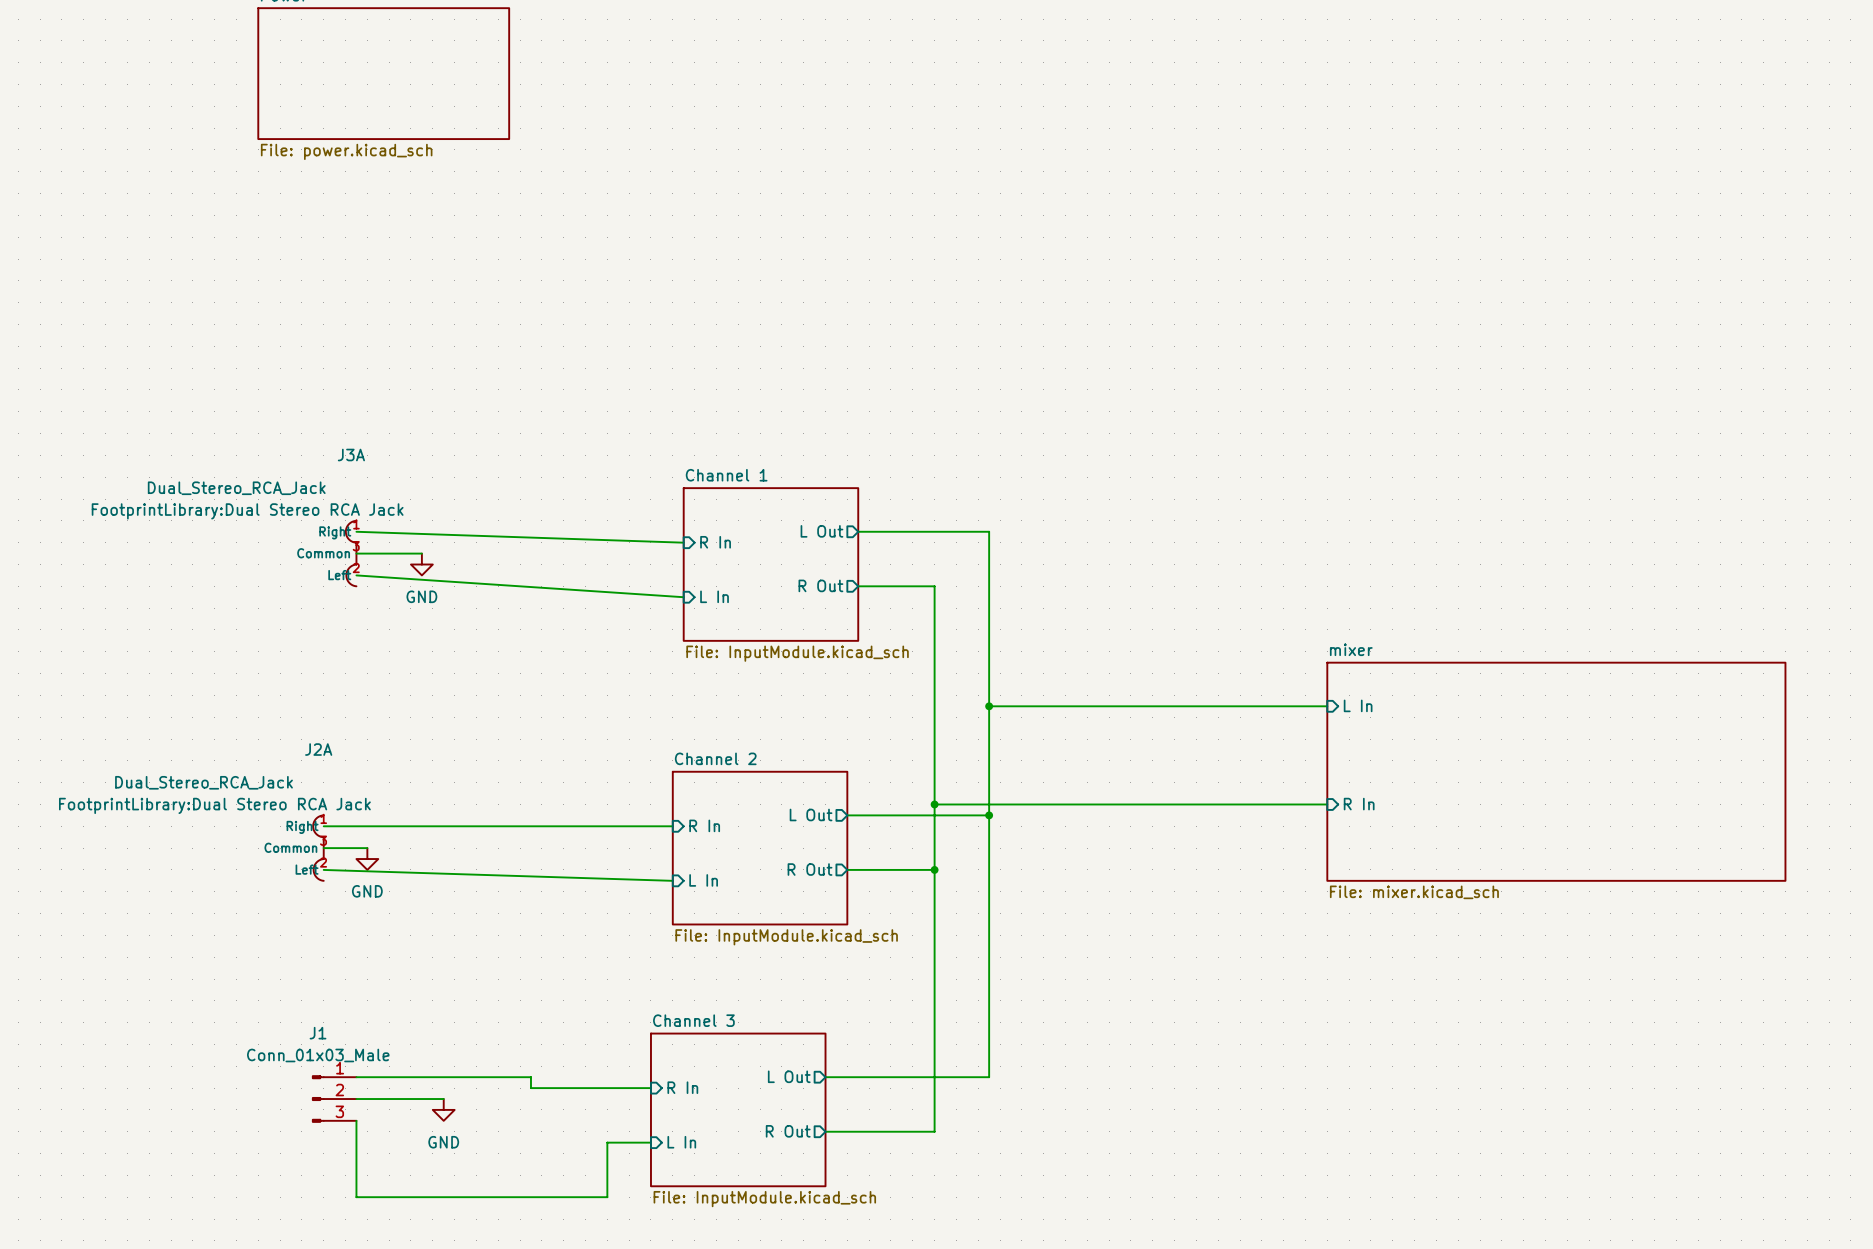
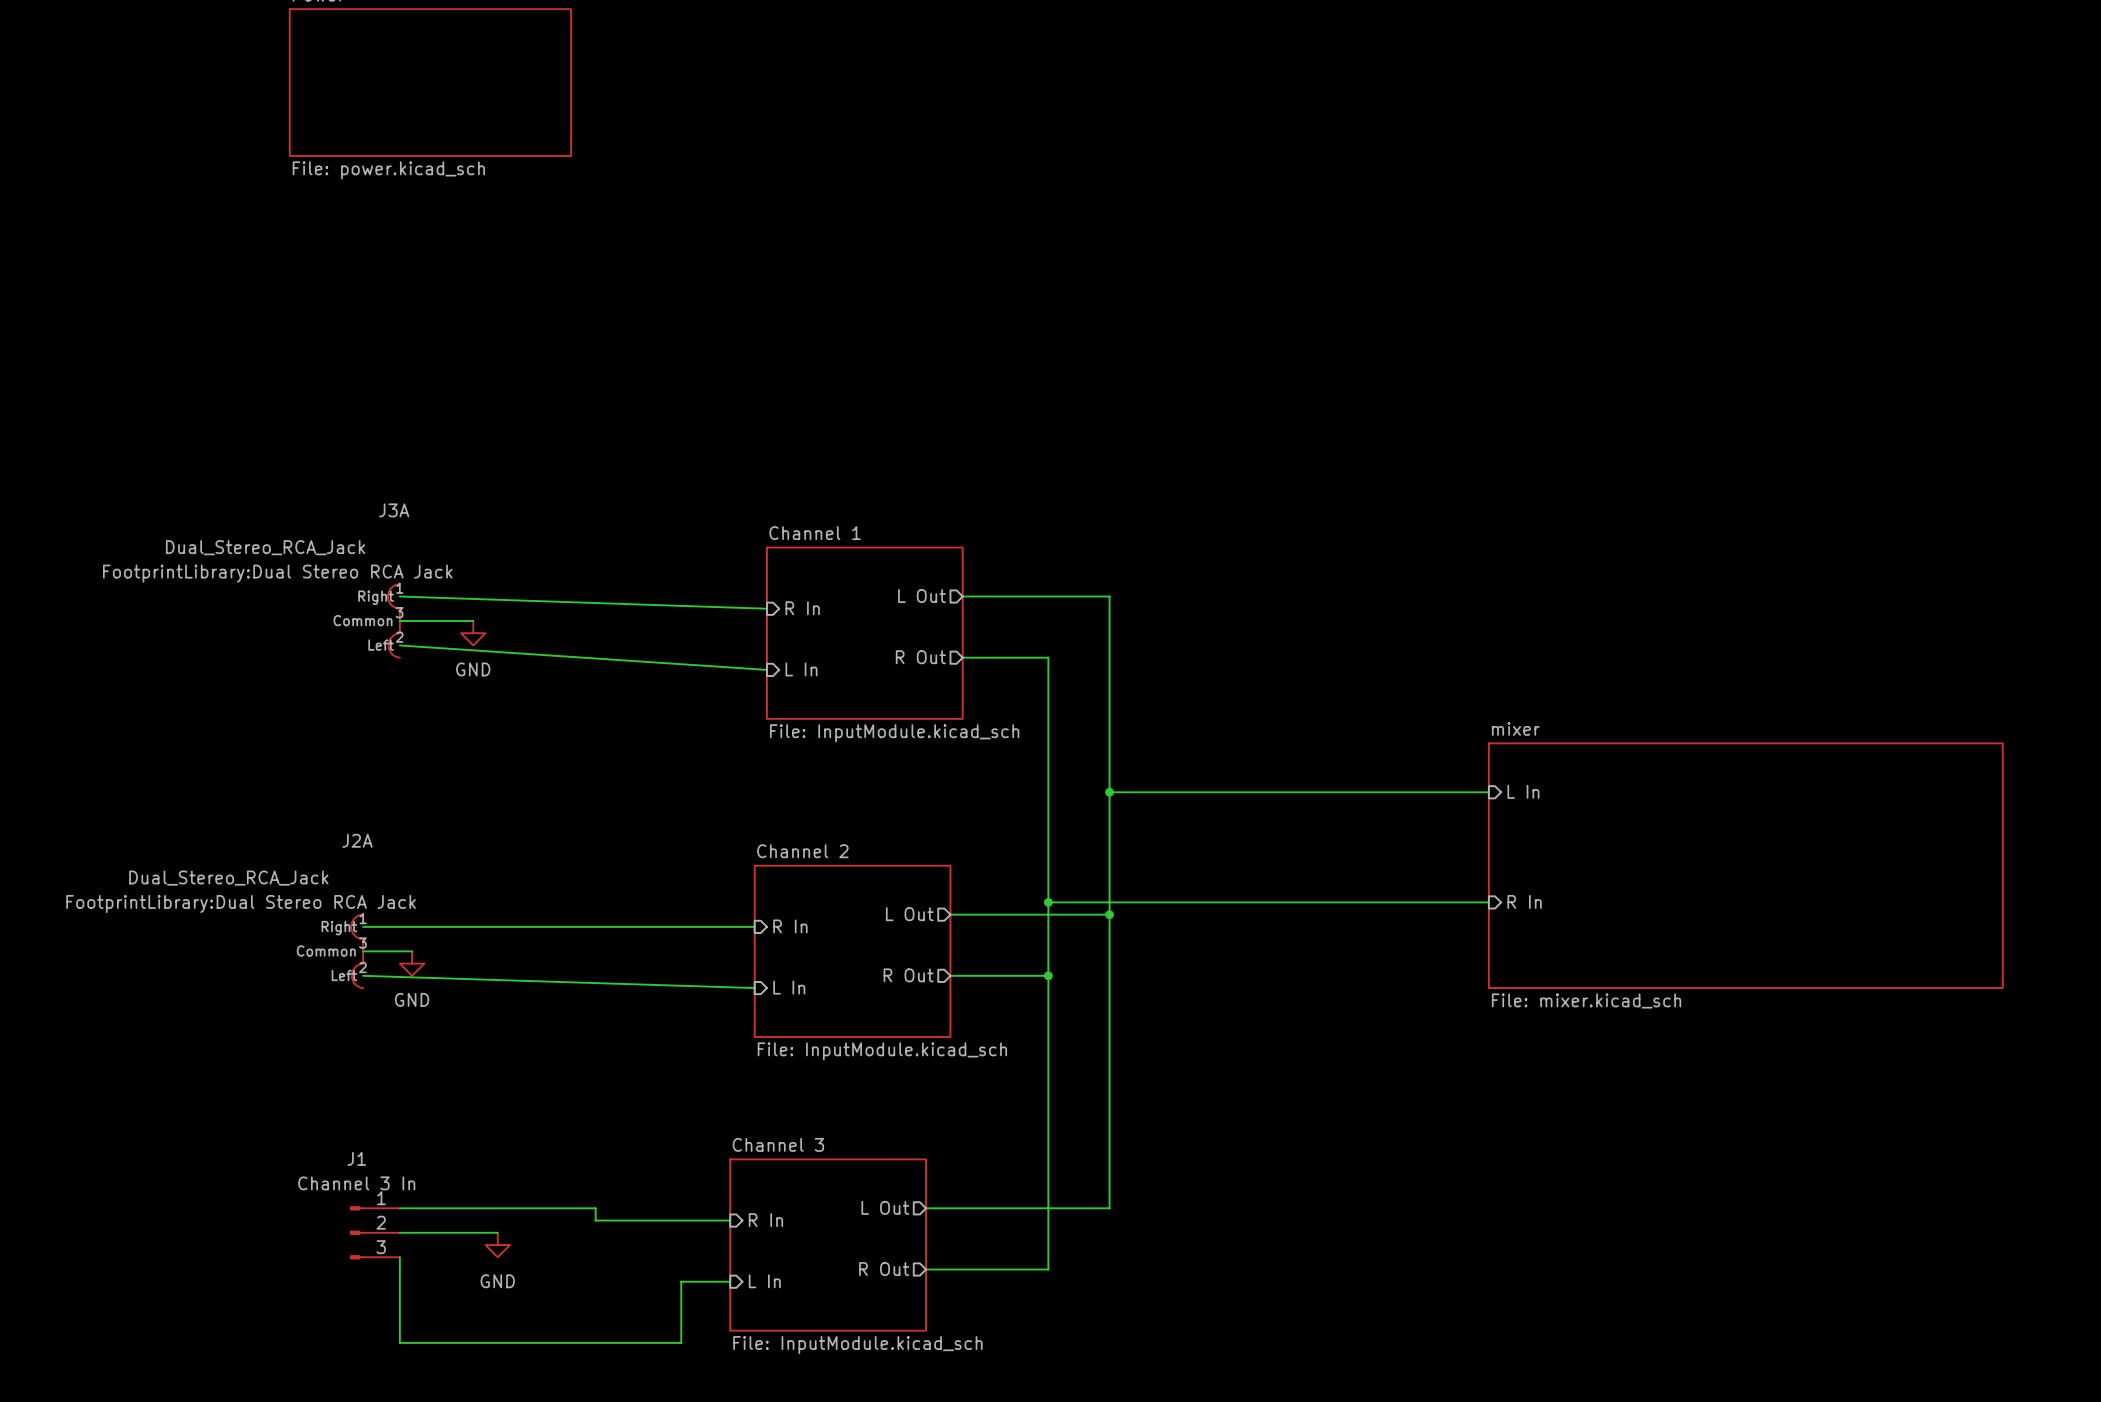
J1 value: Conn_01x03_Male (318, 1055) -> Channel 3 In (356, 1183)

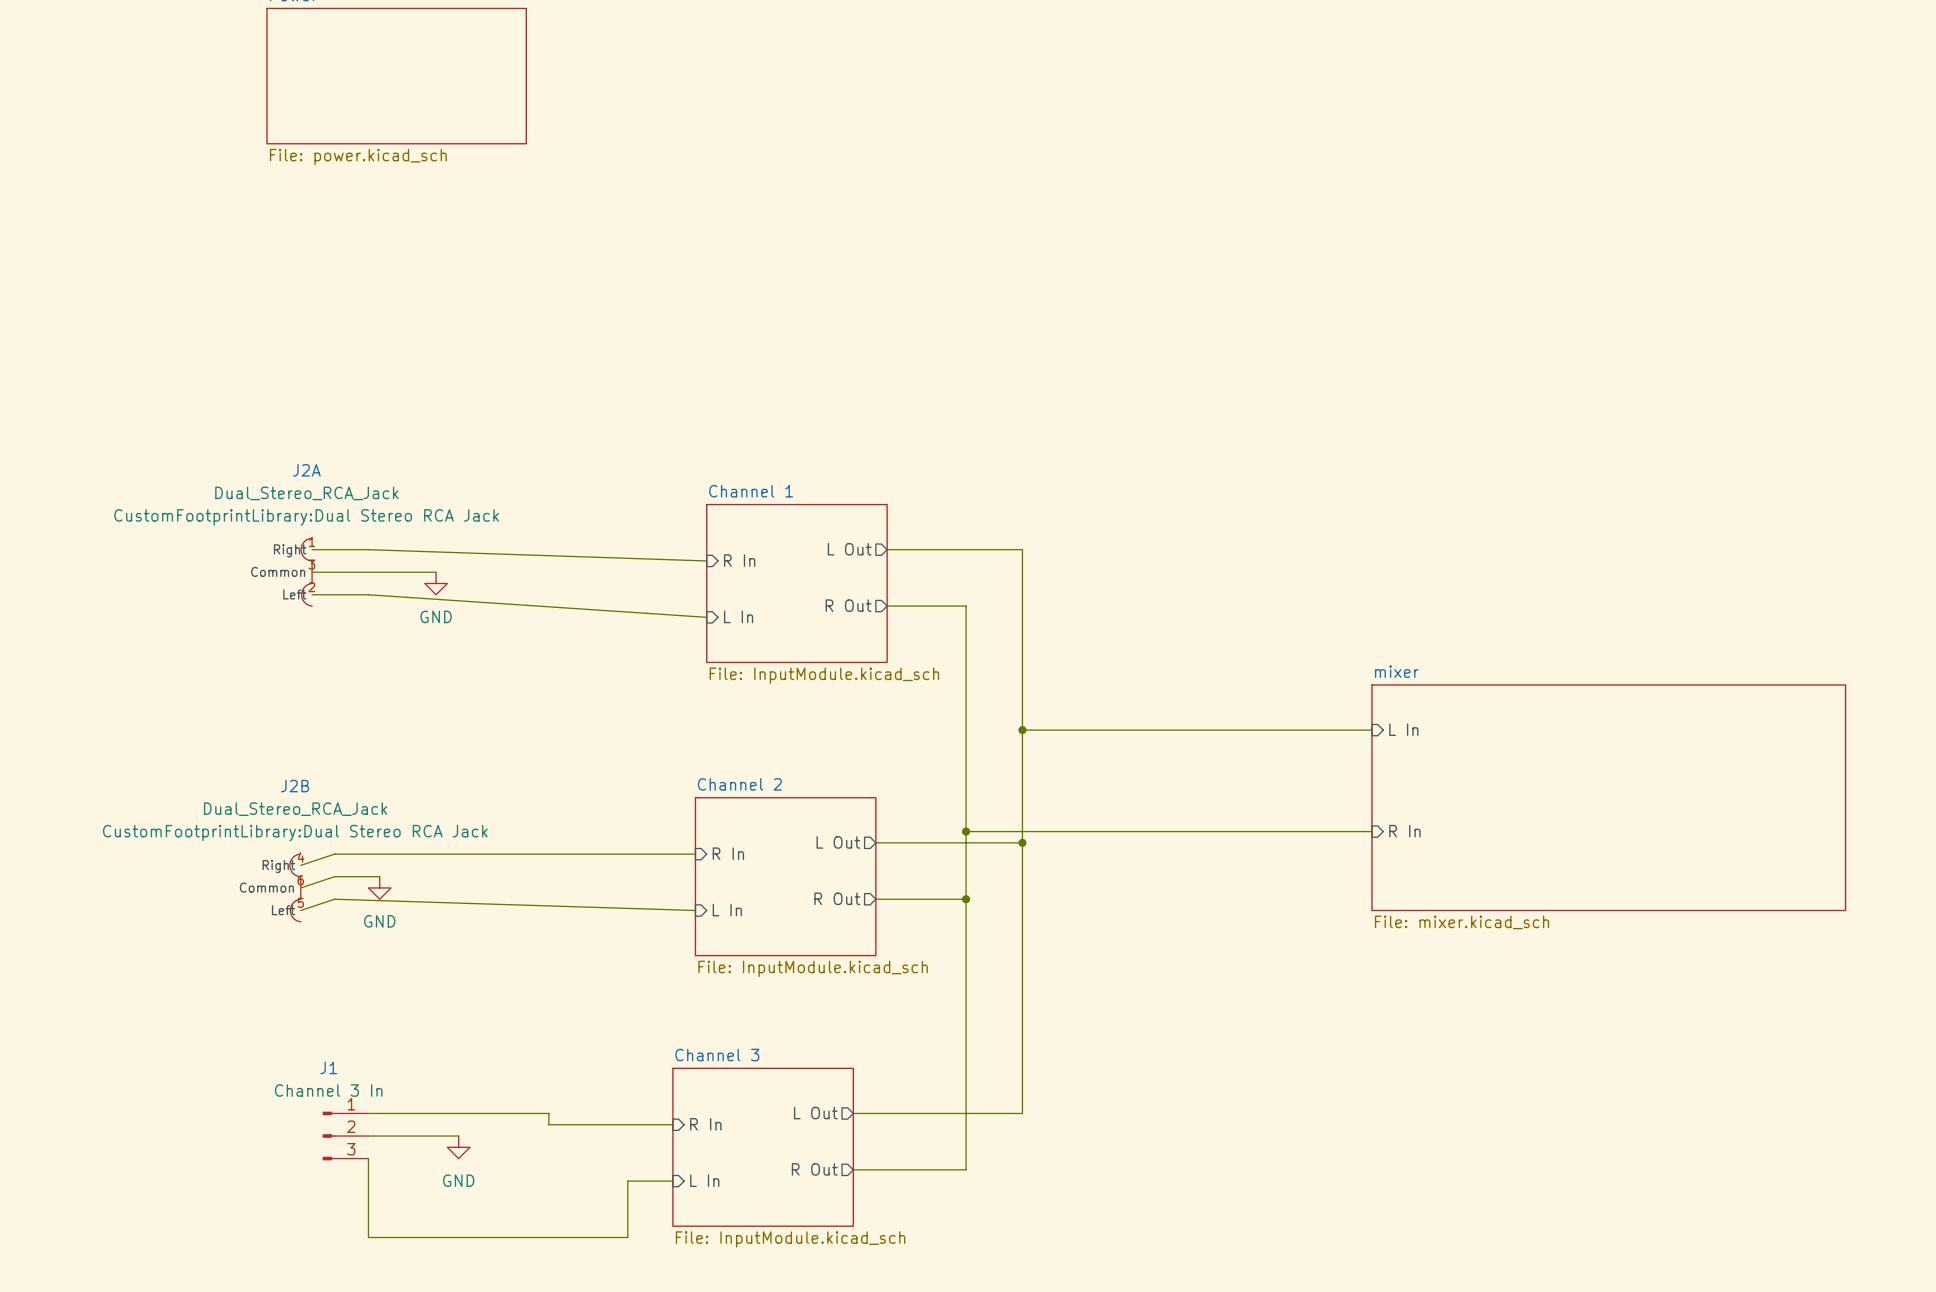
wire: none -> (312, 549) (368, 549)
wire: none -> (312, 572) (368, 572)
J3A: Dual_Stereo_RCA_Jack (393, 620) -> none
wire: none -> (312, 594) (368, 594)
J2A value position: Dual_Stereo_RCA_Jack (228, 878) -> Dual_Stereo_RCA_Jack (306, 493)
J2A text: FootprintLibrary:Dual Stereo RCA Jack (241, 903) -> CustomFootprintLibrary:Dual Stereo RCA Jack (306, 517)
wire: none -> (334, 854) (300, 865)
J2A position: (357, 951) -> (306, 572)
wire: none -> (334, 876) (300, 887)
J2B: none -> Dual_Stereo_RCA_Jack (295, 887)
wire: none -> (334, 899) (300, 910)

